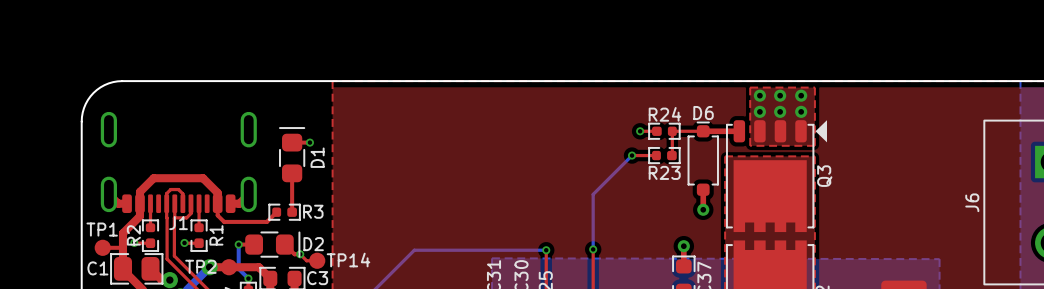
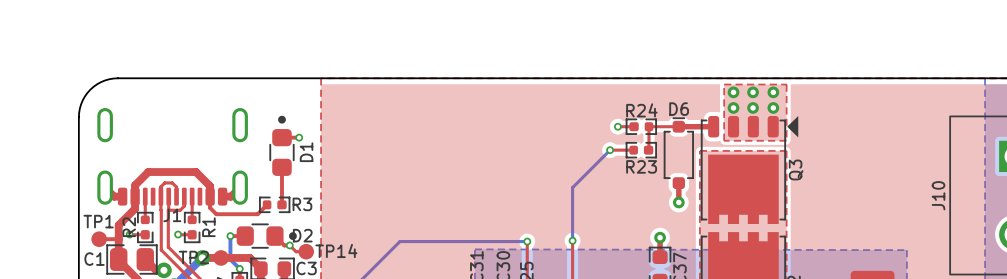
D1 footprint: [279, 127, 306, 183] -> [269, 115, 295, 176]
J6 name: J6 (972, 202) -> J10 (938, 195)
D2 footprint: [245, 231, 301, 258] -> [236, 223, 297, 249]

